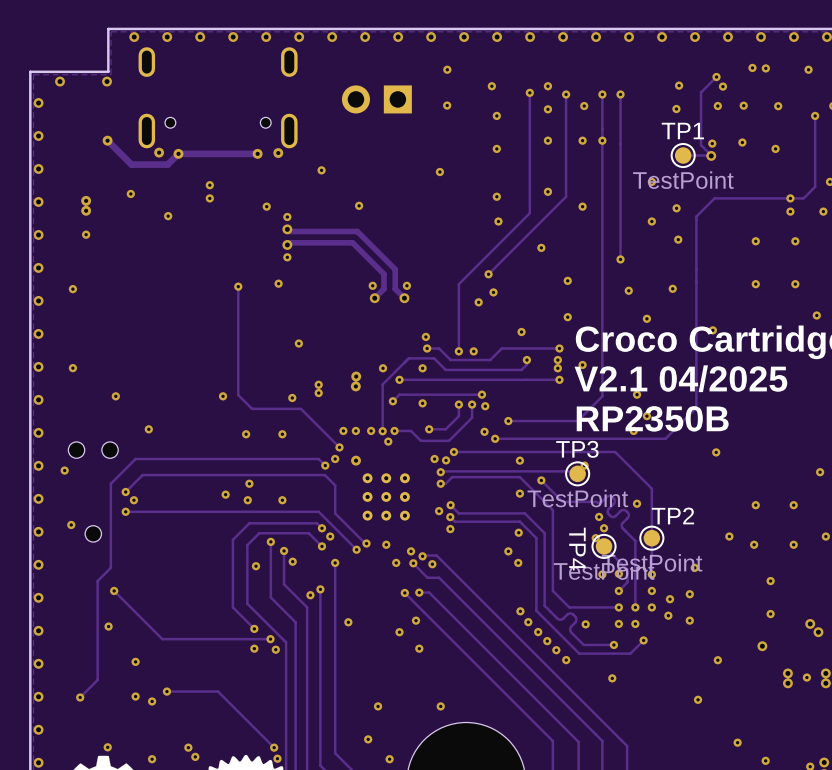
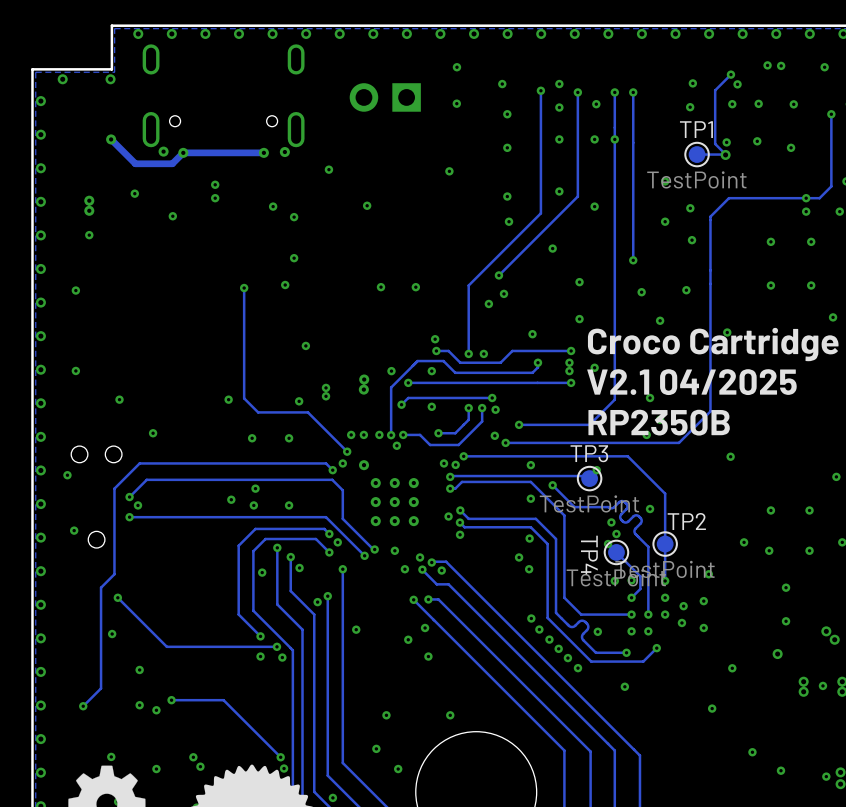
track: (287, 229) (289, 231) (357, 231) (395, 269) (395, 288) (404, 298) -> none
via: (287, 229) -> none
track: (287, 244) (289, 242) (352, 242) (383, 274) (383, 288) (374, 298) -> none
via: (287, 244) -> none
via: (374, 298) -> none
via: (404, 298) -> none

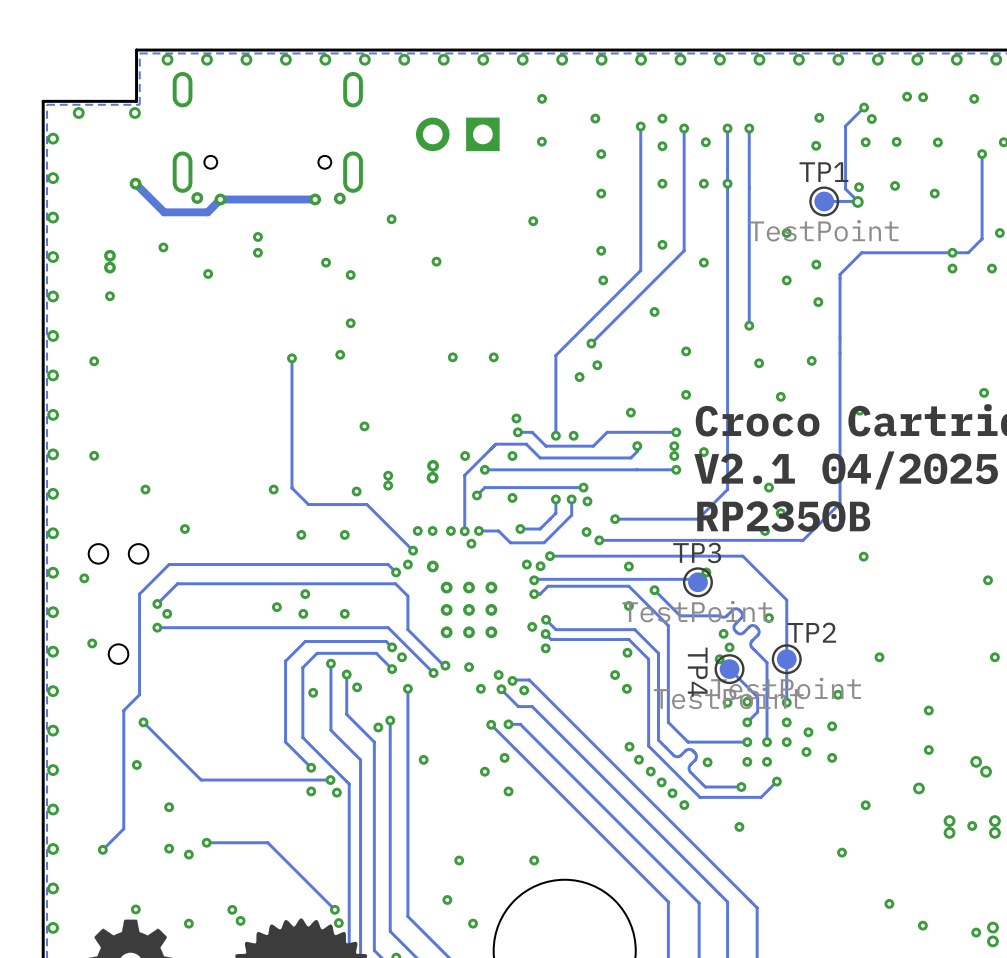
via: (770, 241) -> none
via: (811, 241) -> none
via: (770, 285) -> none
via: (811, 285) -> none
via: (770, 510) -> none
via: (809, 510) -> none
via: (769, 550) -> none
via: (809, 550) -> none

